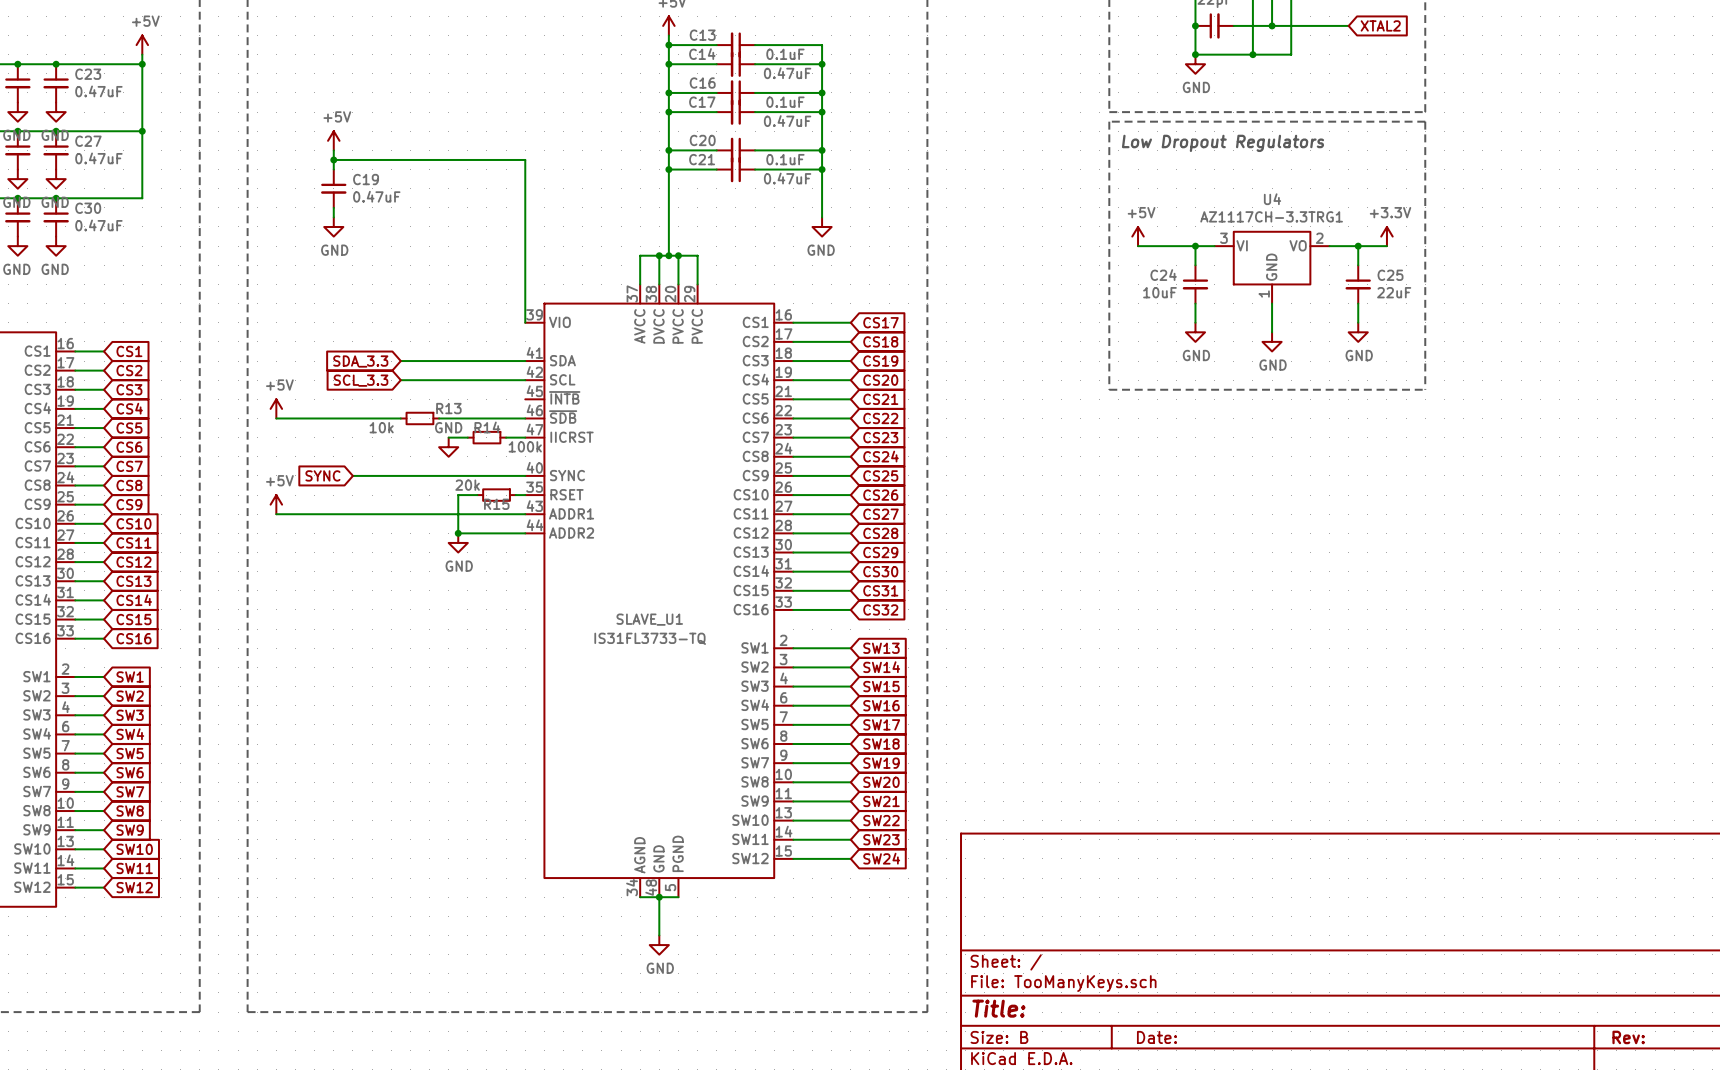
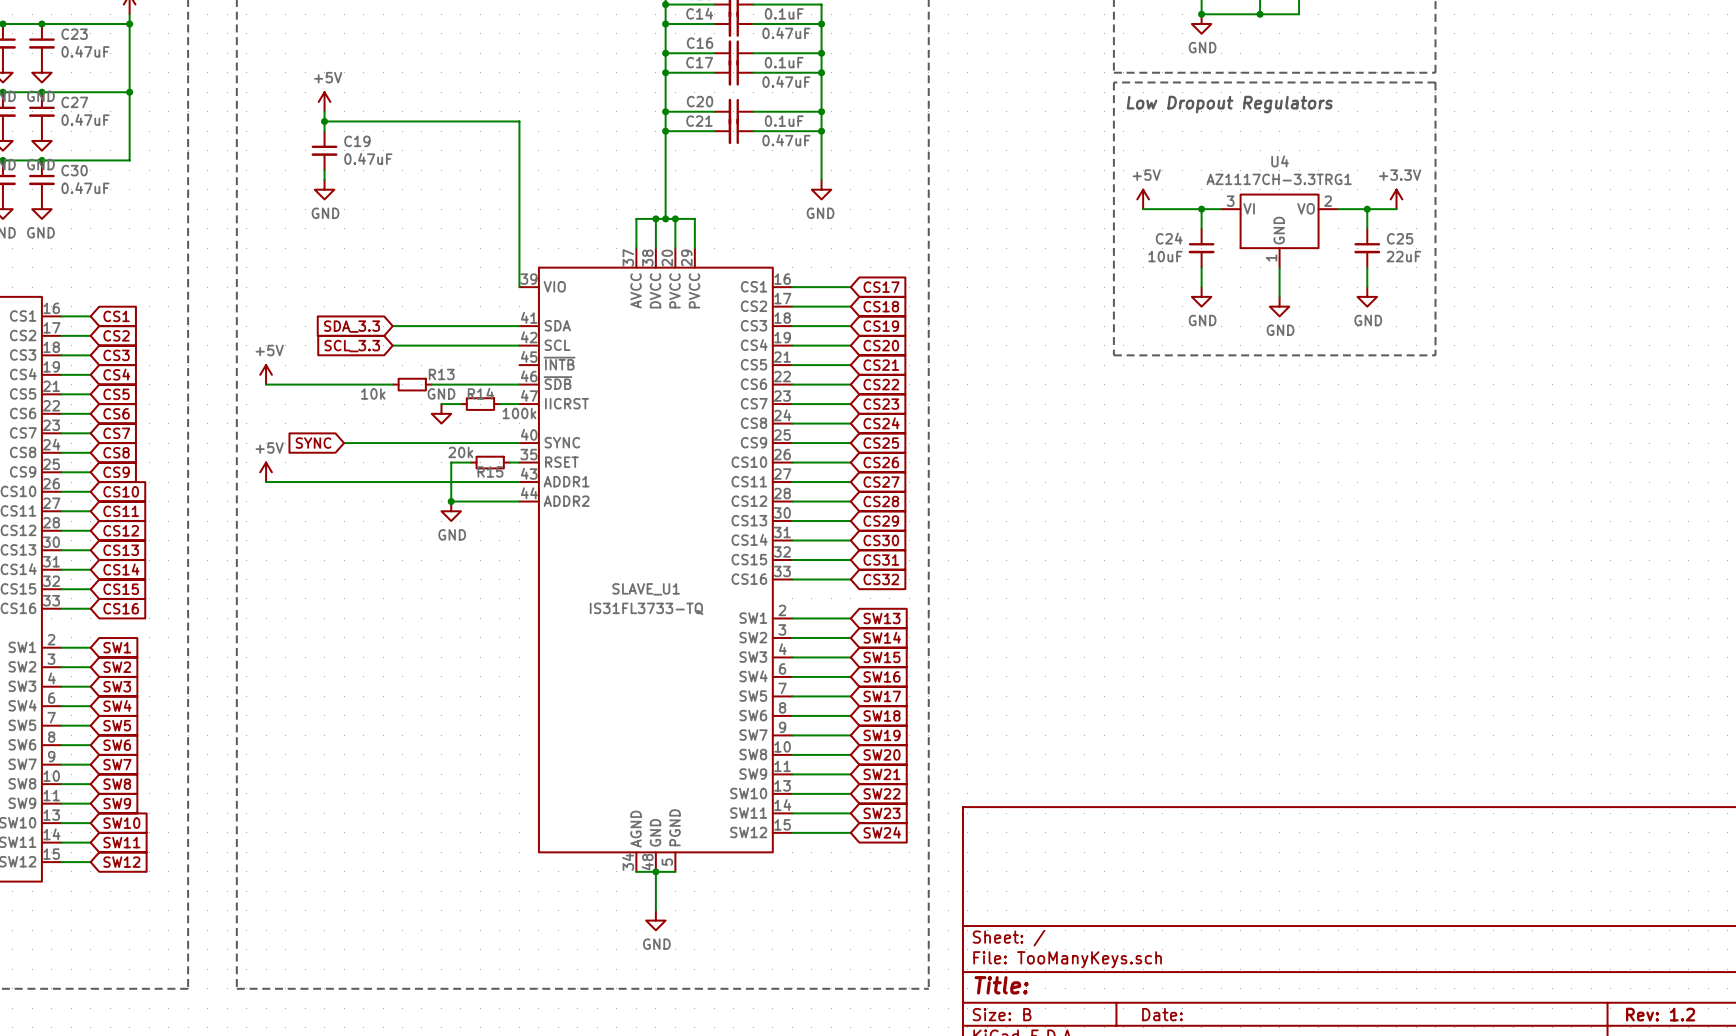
title block: Rev: (1628, 1037) -> Rev: 1.2 (1660, 1014)

